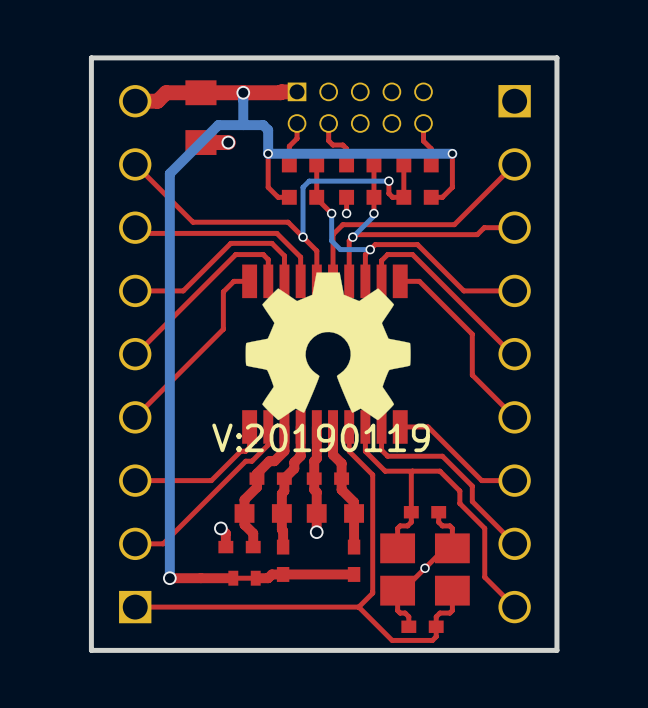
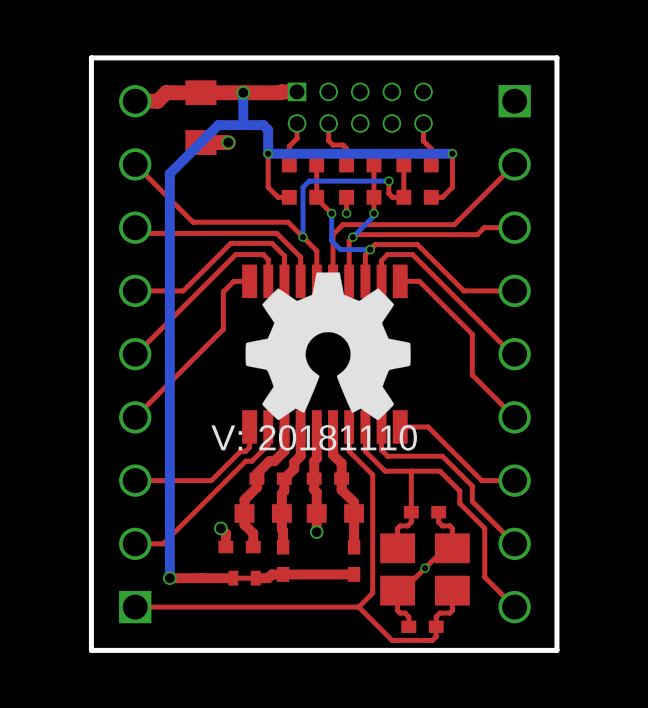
drawing shape: [212, 423, 430, 453] -> [211, 425, 417, 451]

